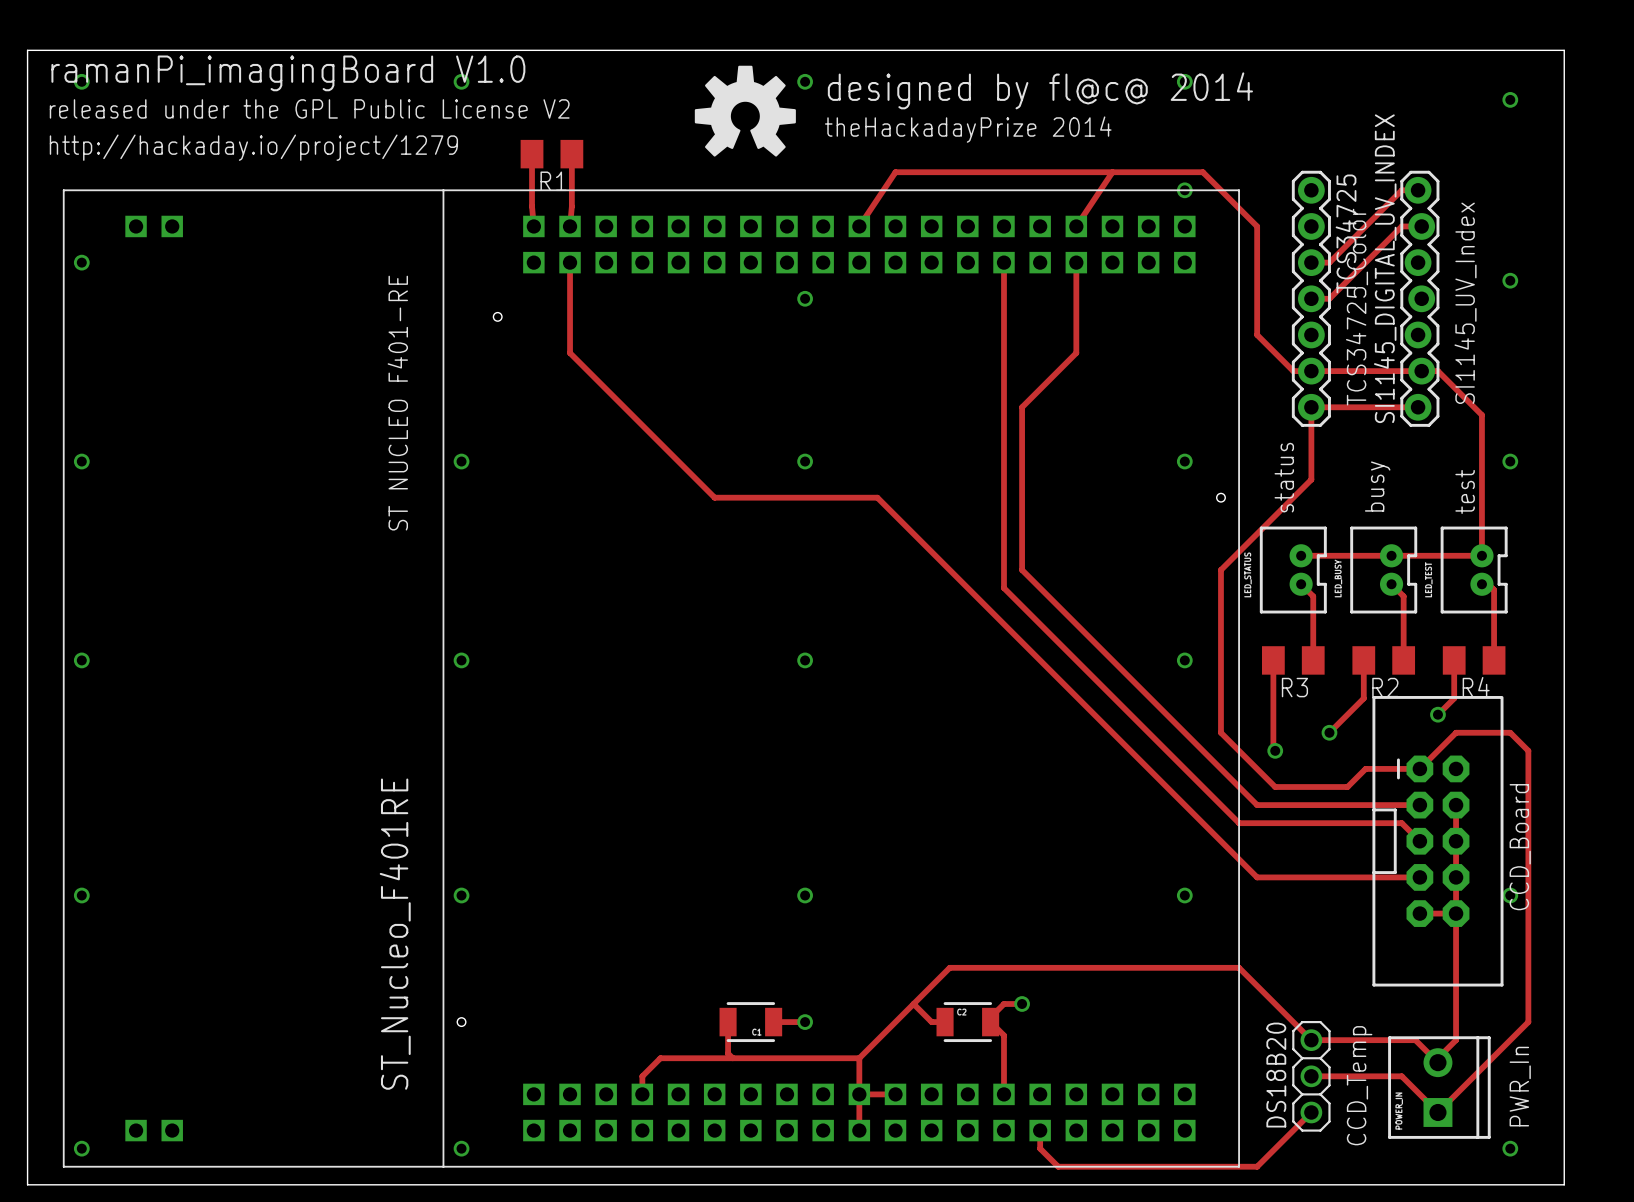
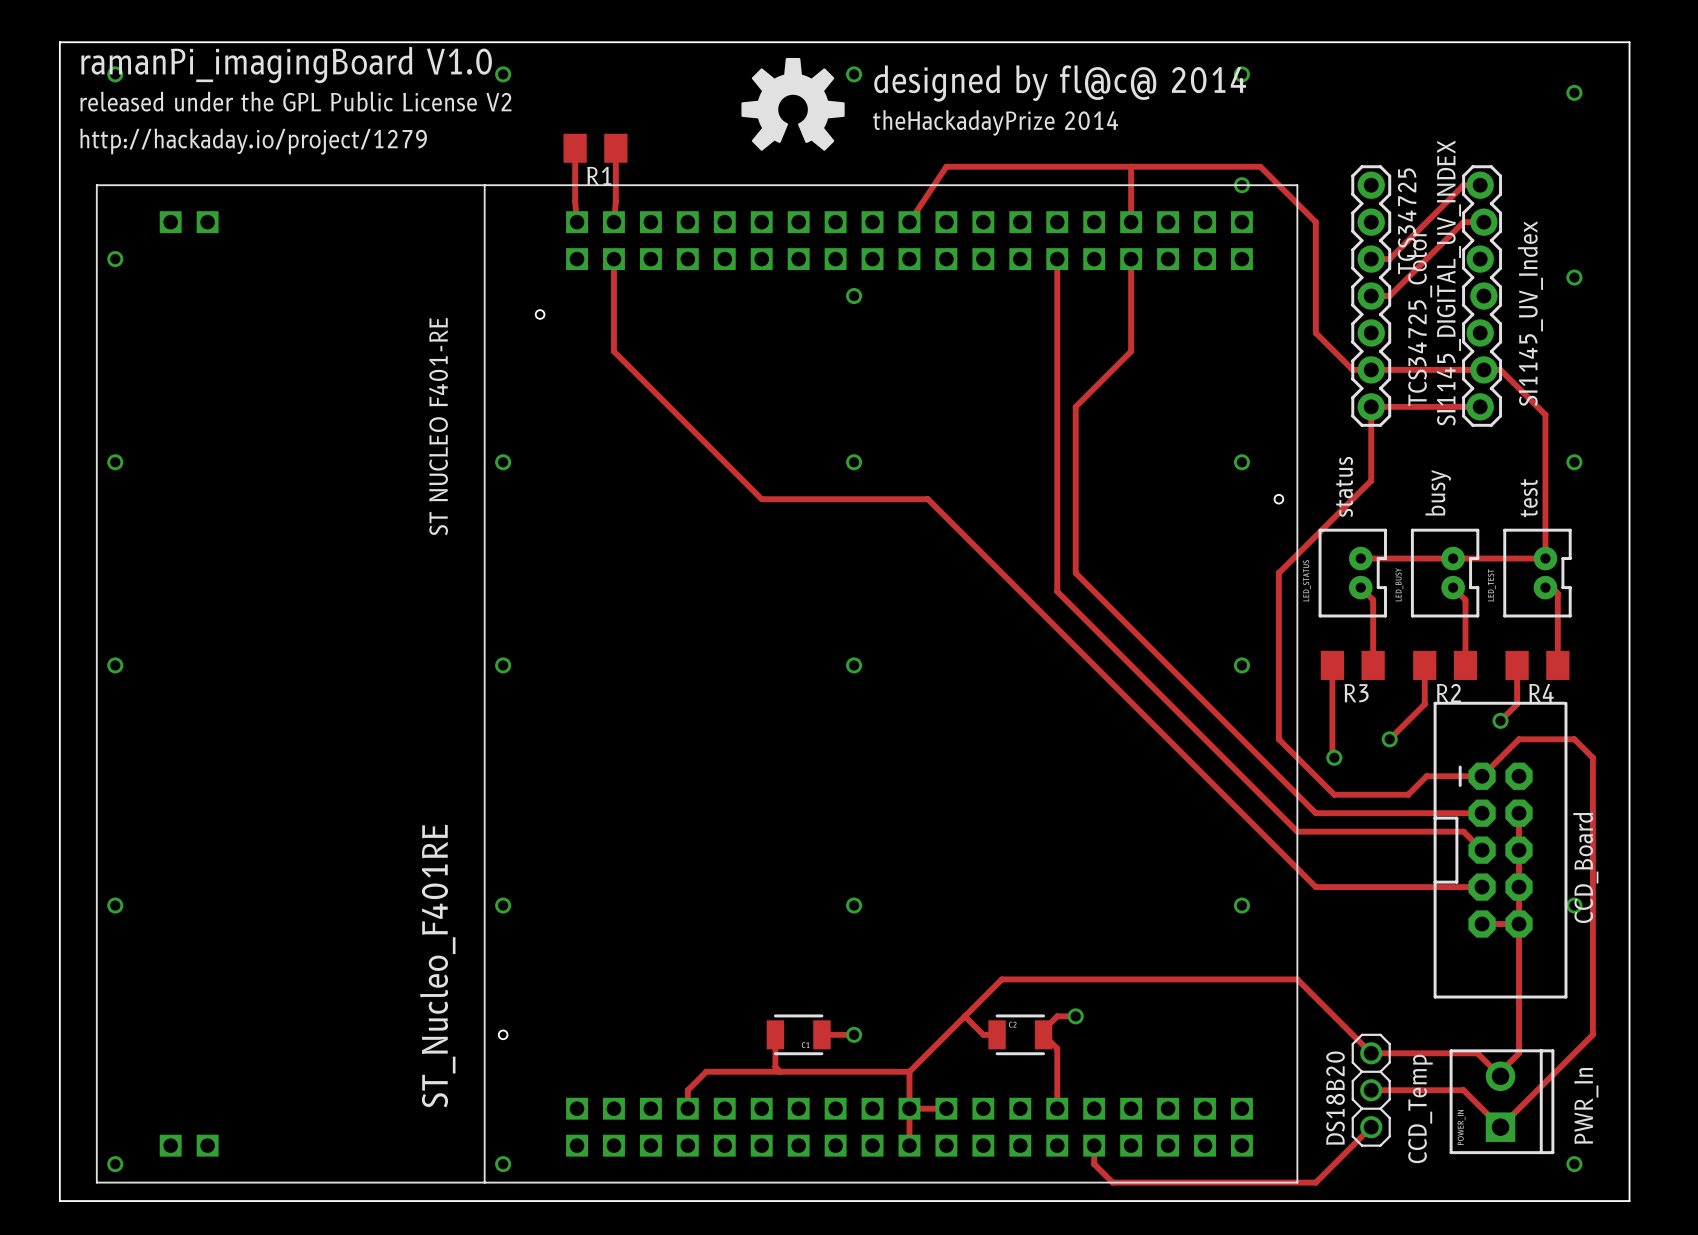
track: (1112, 172) (1076, 226) -> (1131, 166) (1131, 222)

